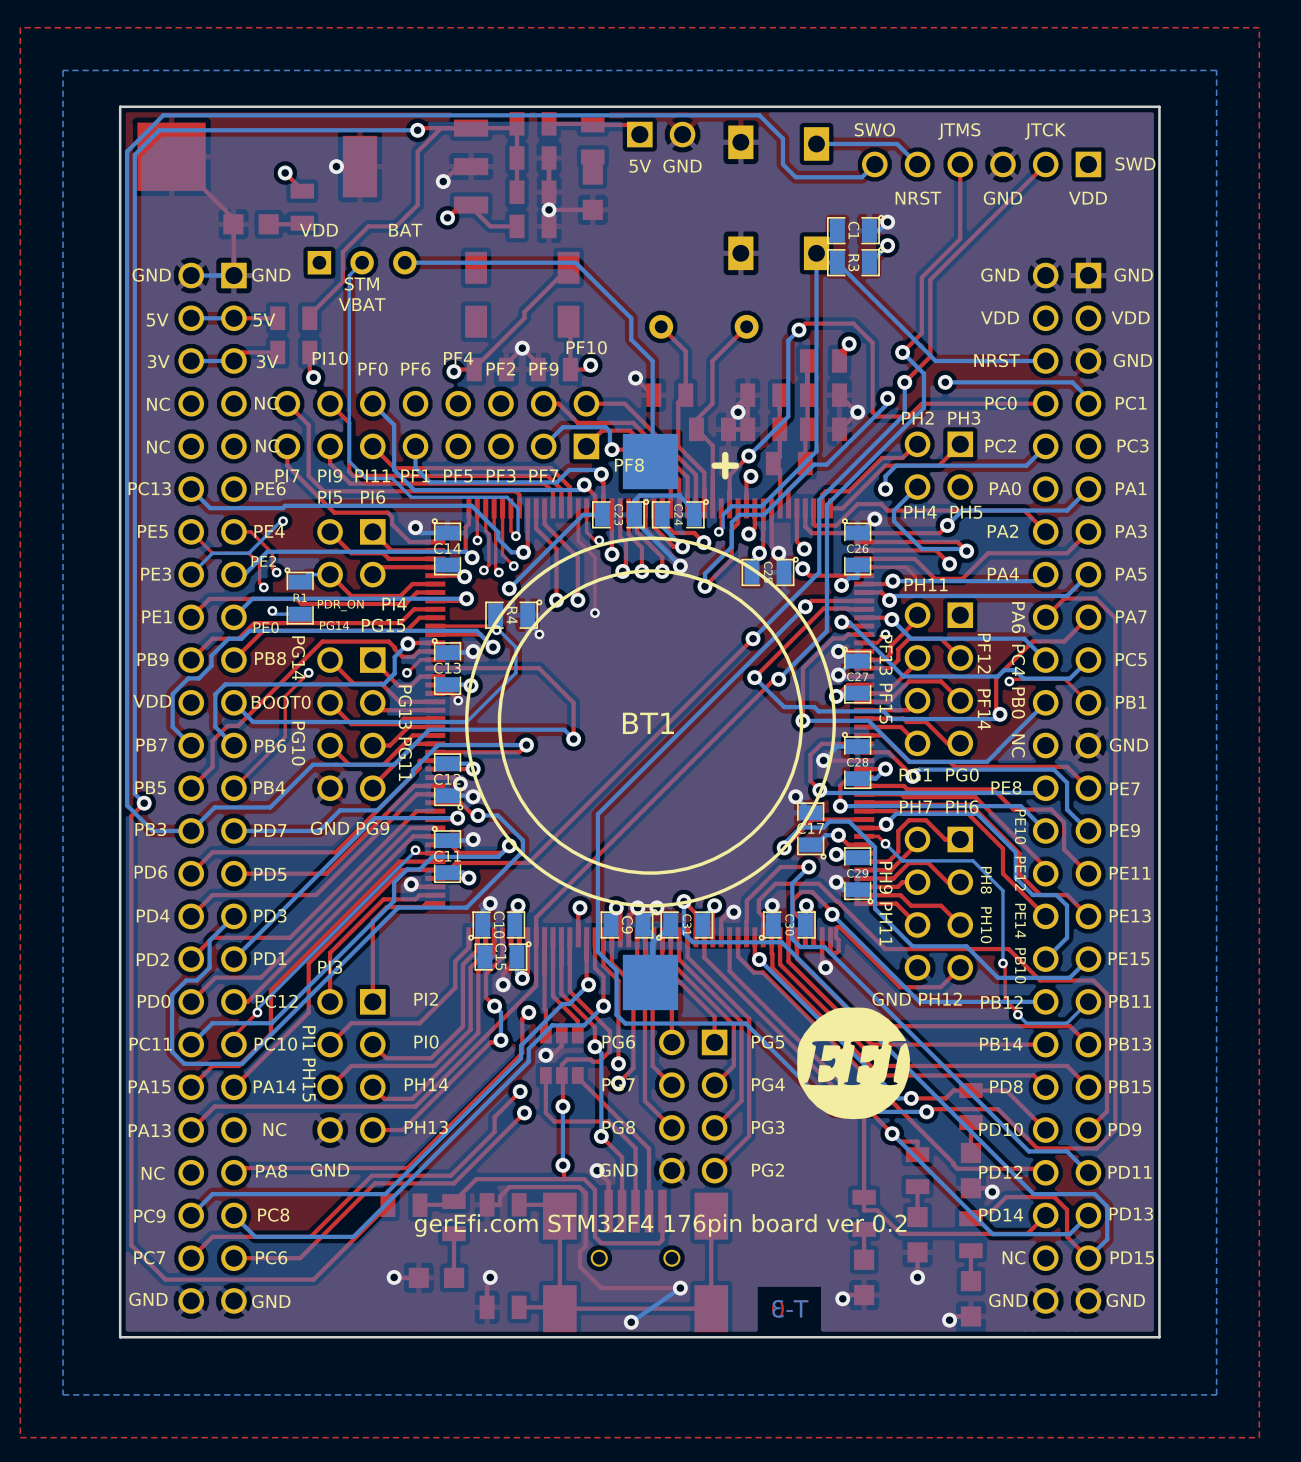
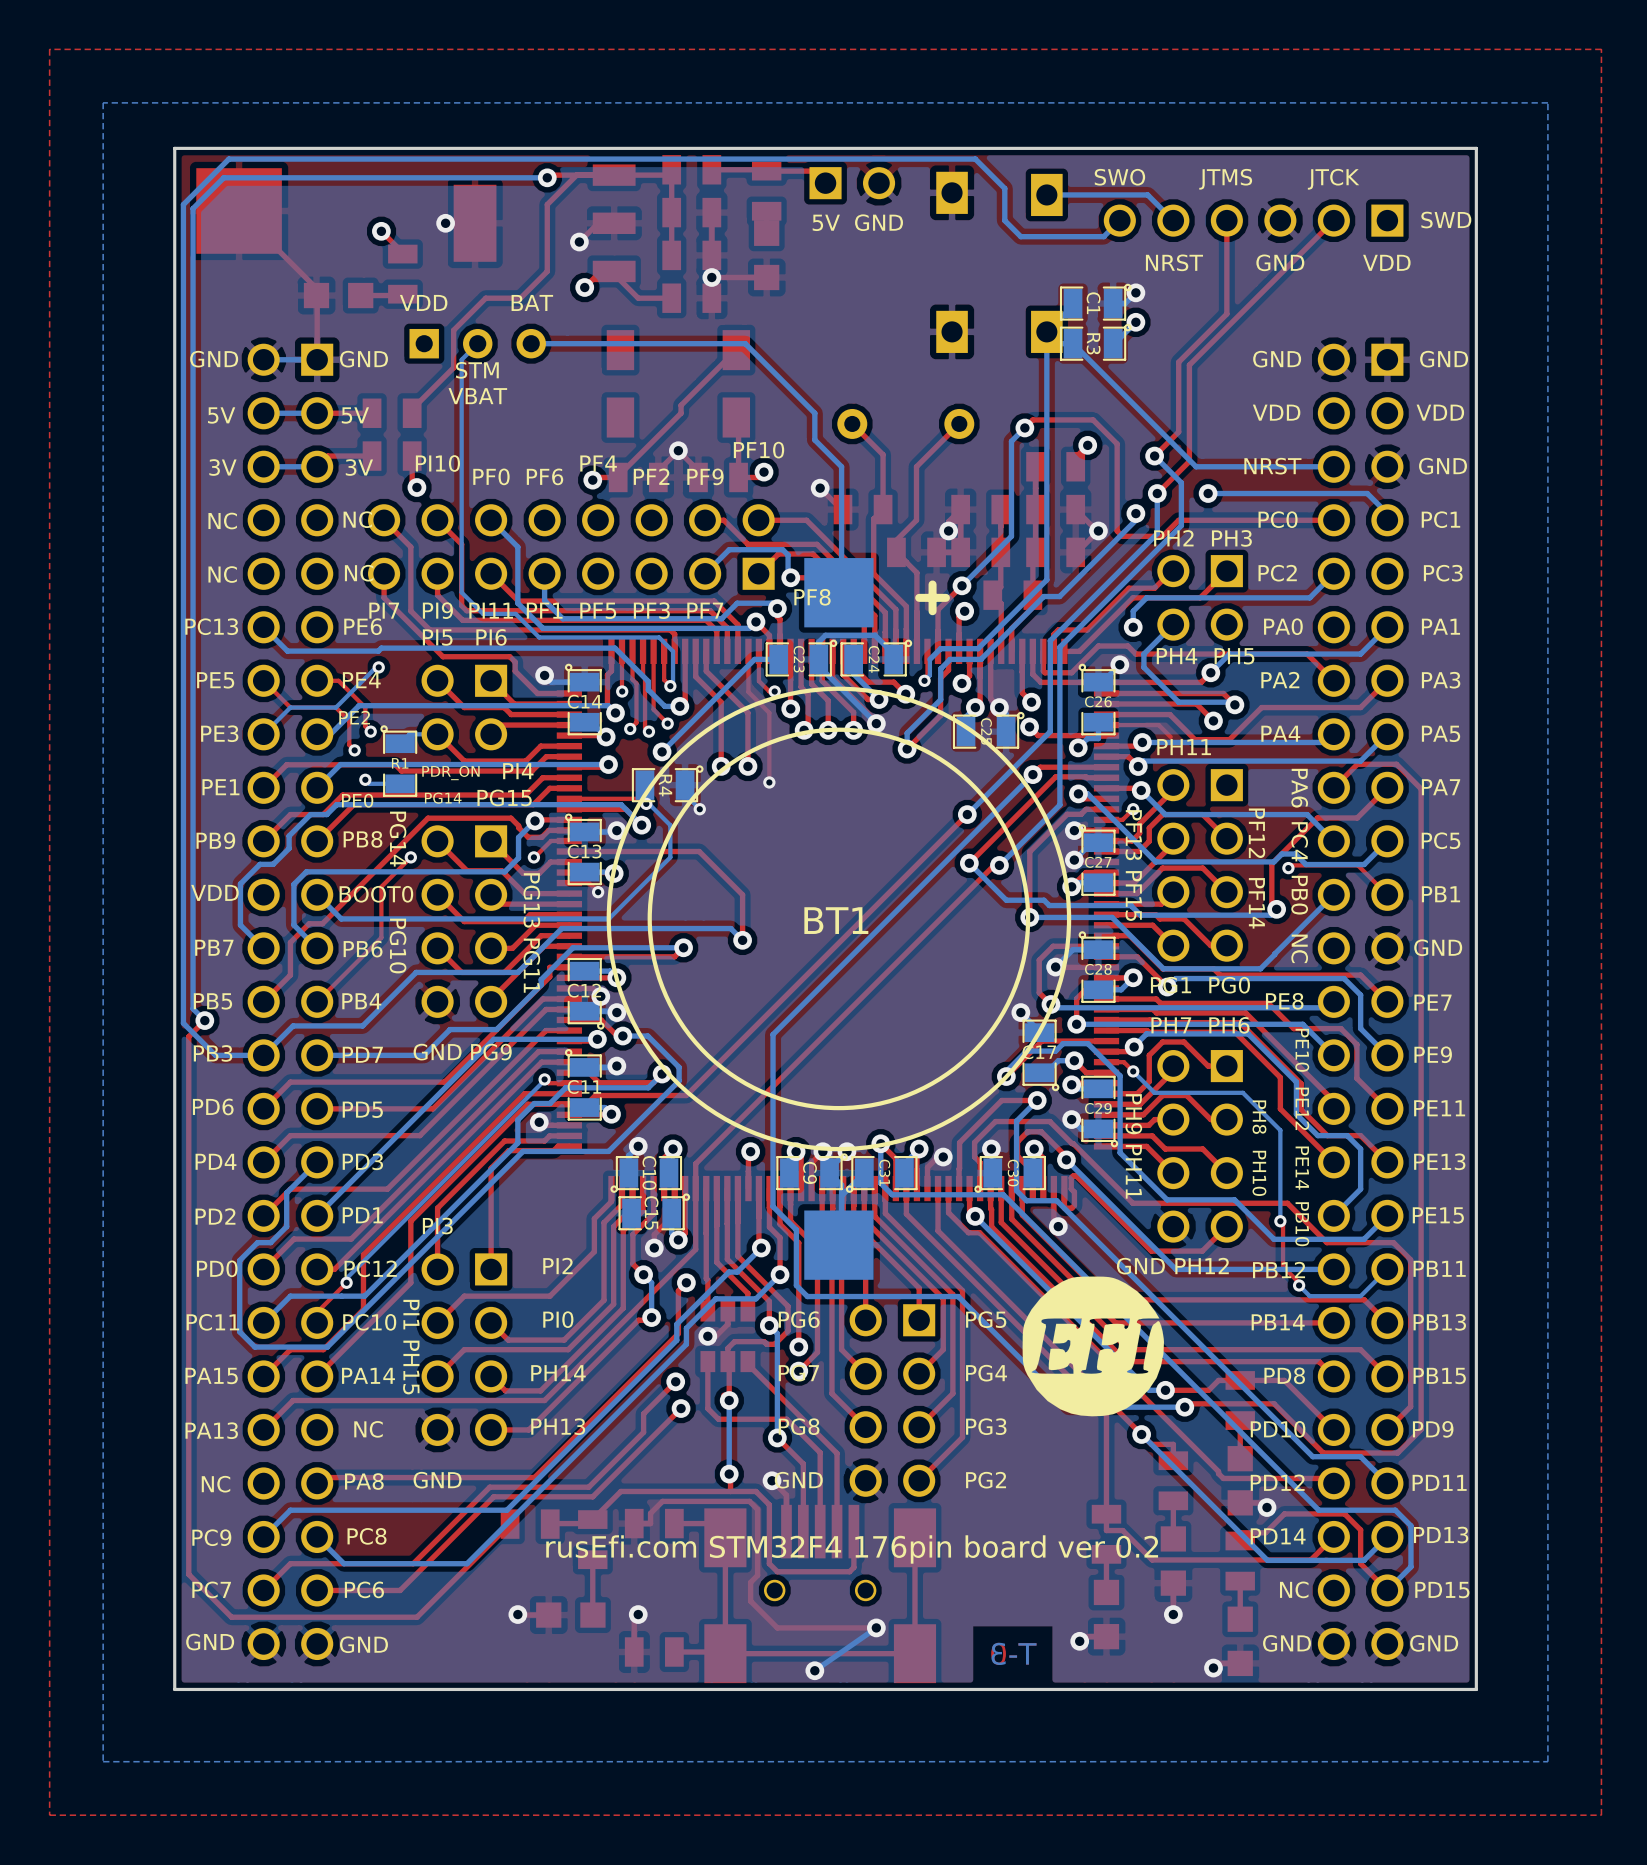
text: gerEfi.com STM32F4 176pin board ver 0.2 (660, 1225) -> rusEfi.com STM32F4 176pin board ver 0.2 (852, 1549)

